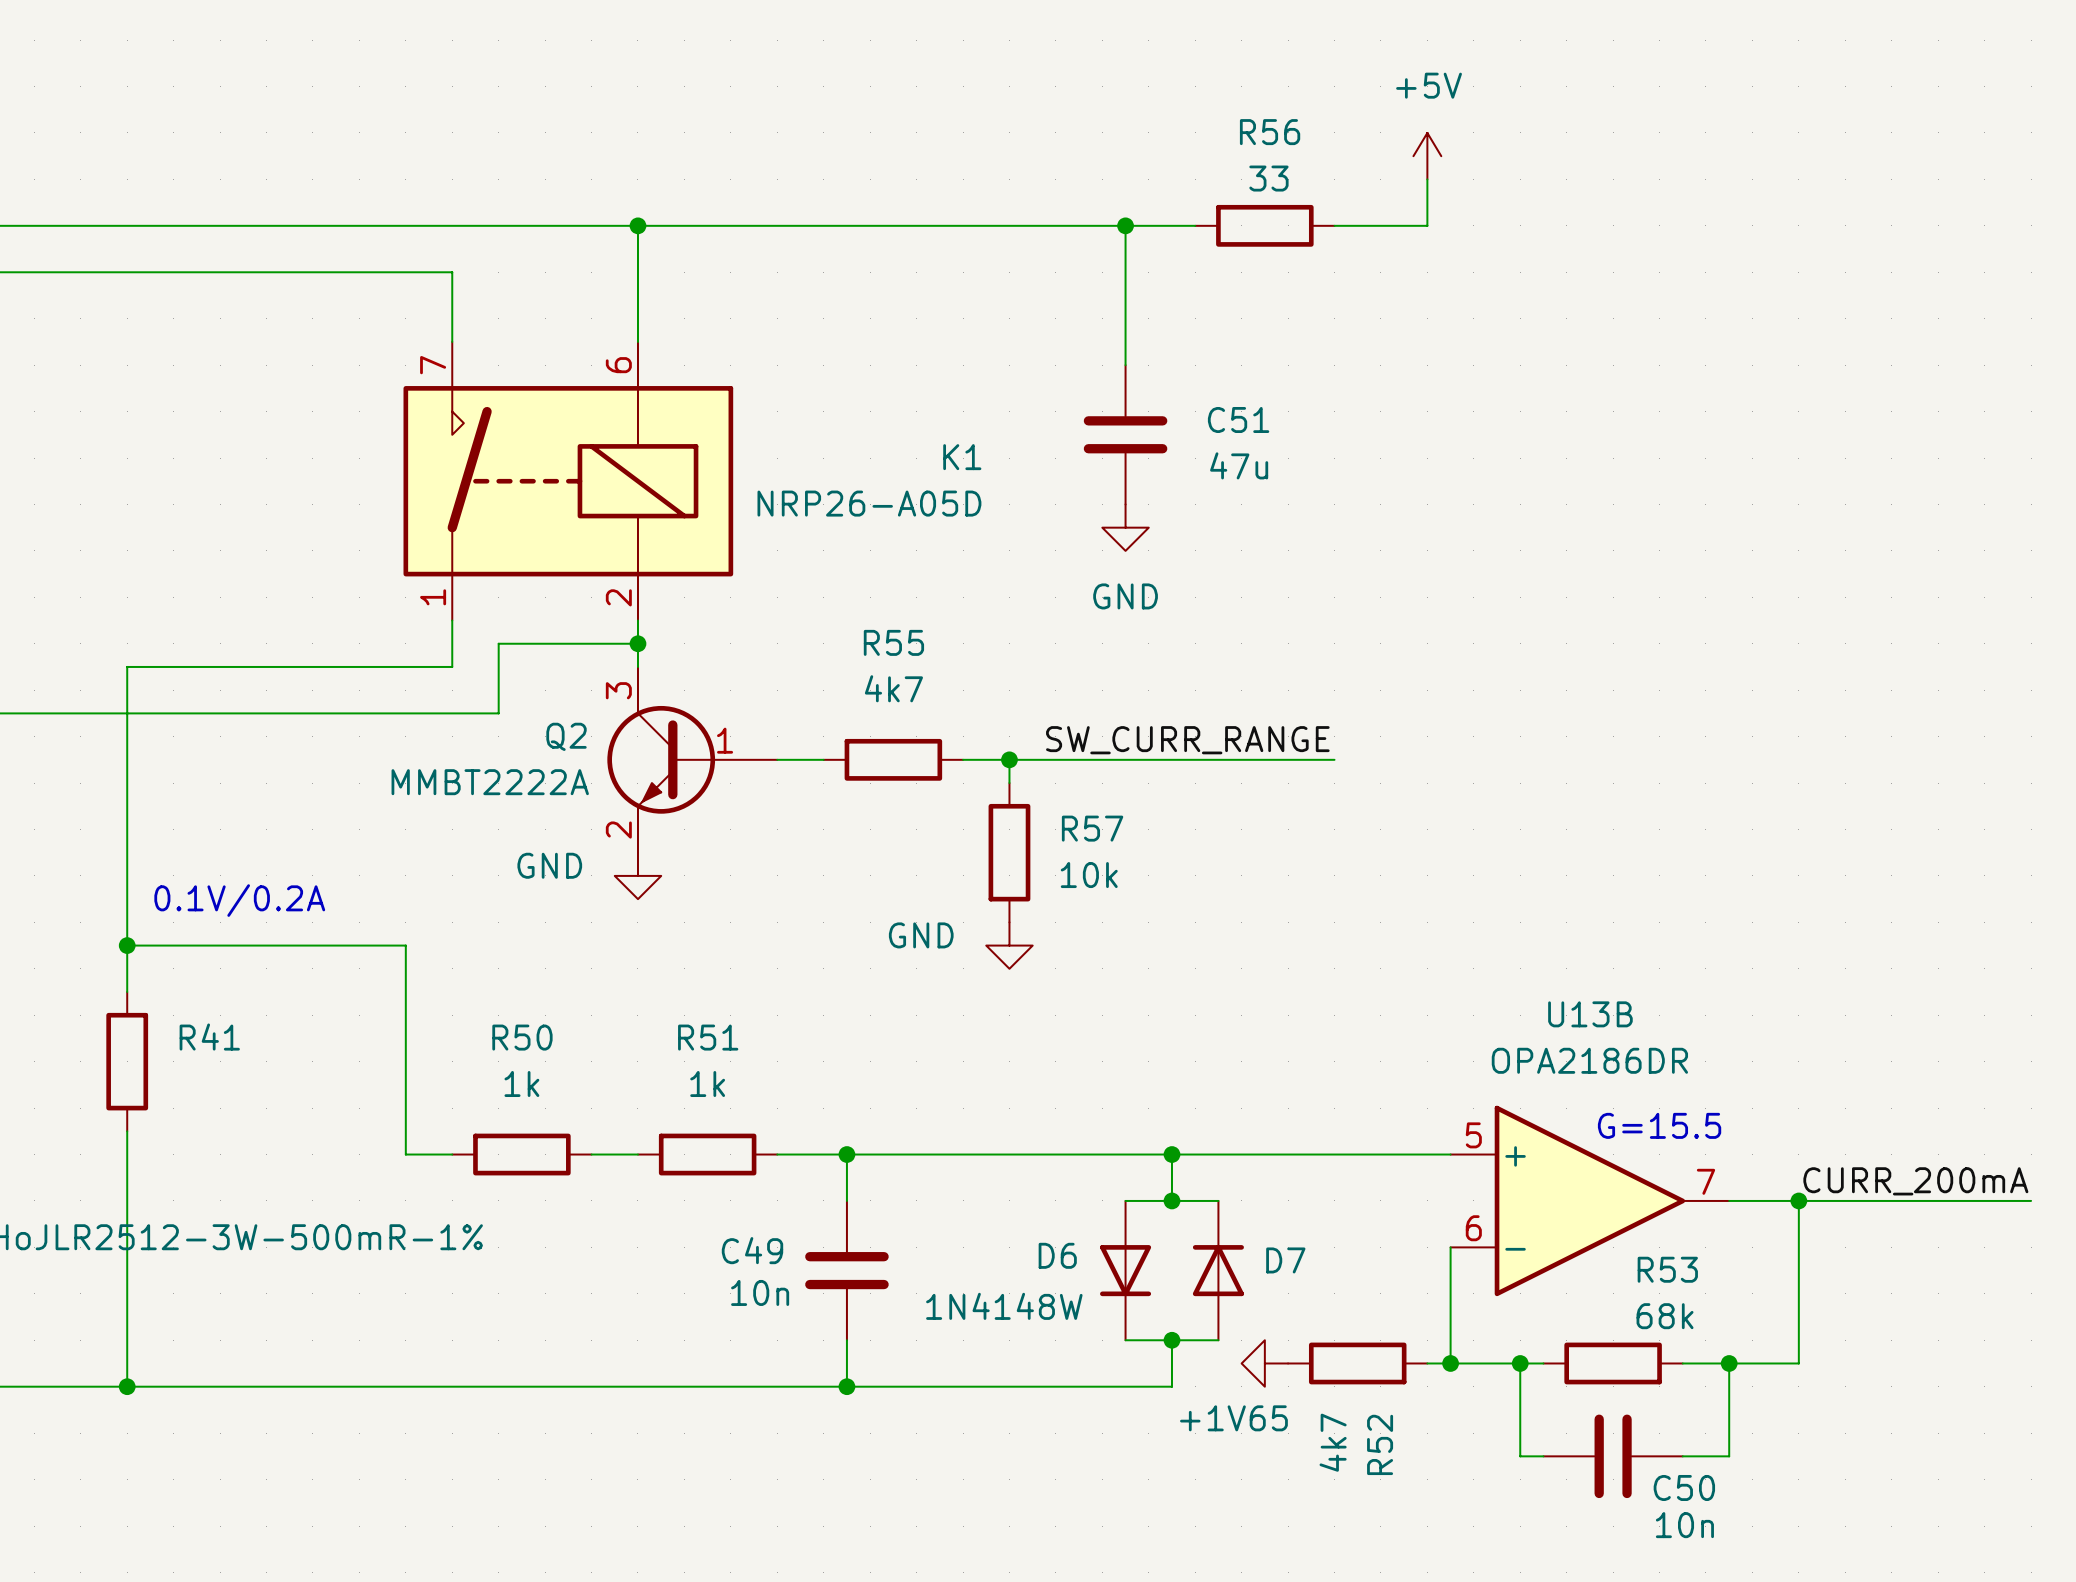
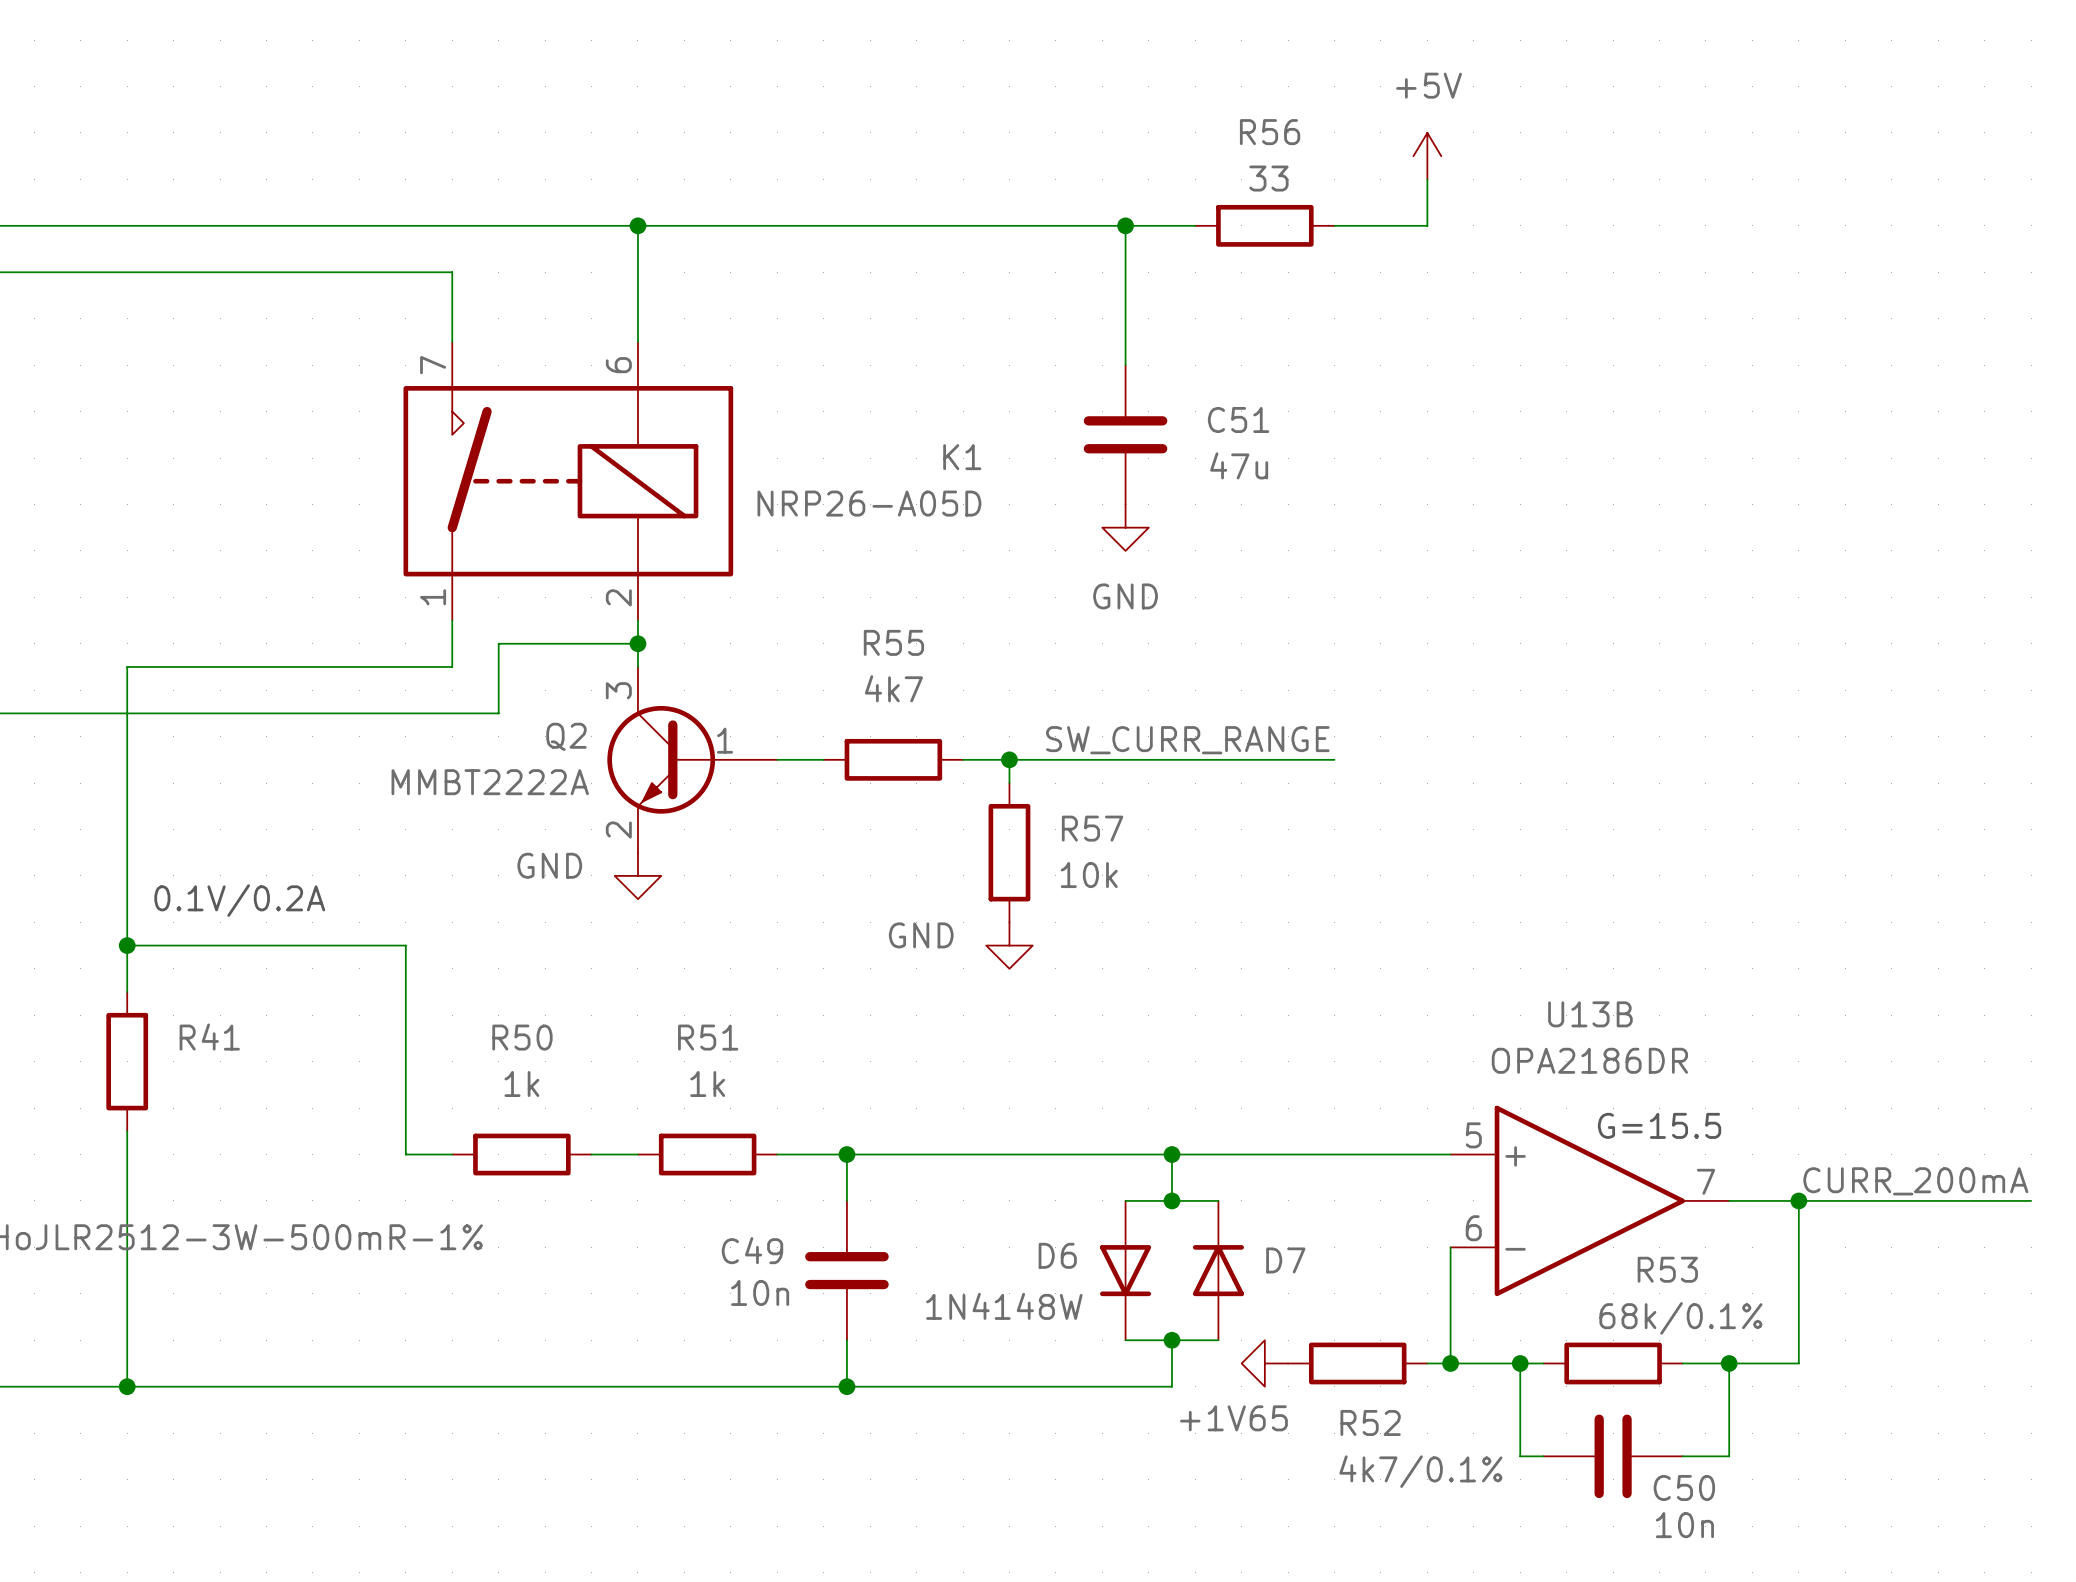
R53 value: 68k (1665, 1316) -> 68k/0.1% (1680, 1318)
R52 value: 4k7 (1333, 1442) -> 4k7/0.1% (1420, 1471)
R52 name rotation: 0° (1380, 1444) -> 90° clockwise (1370, 1422)

